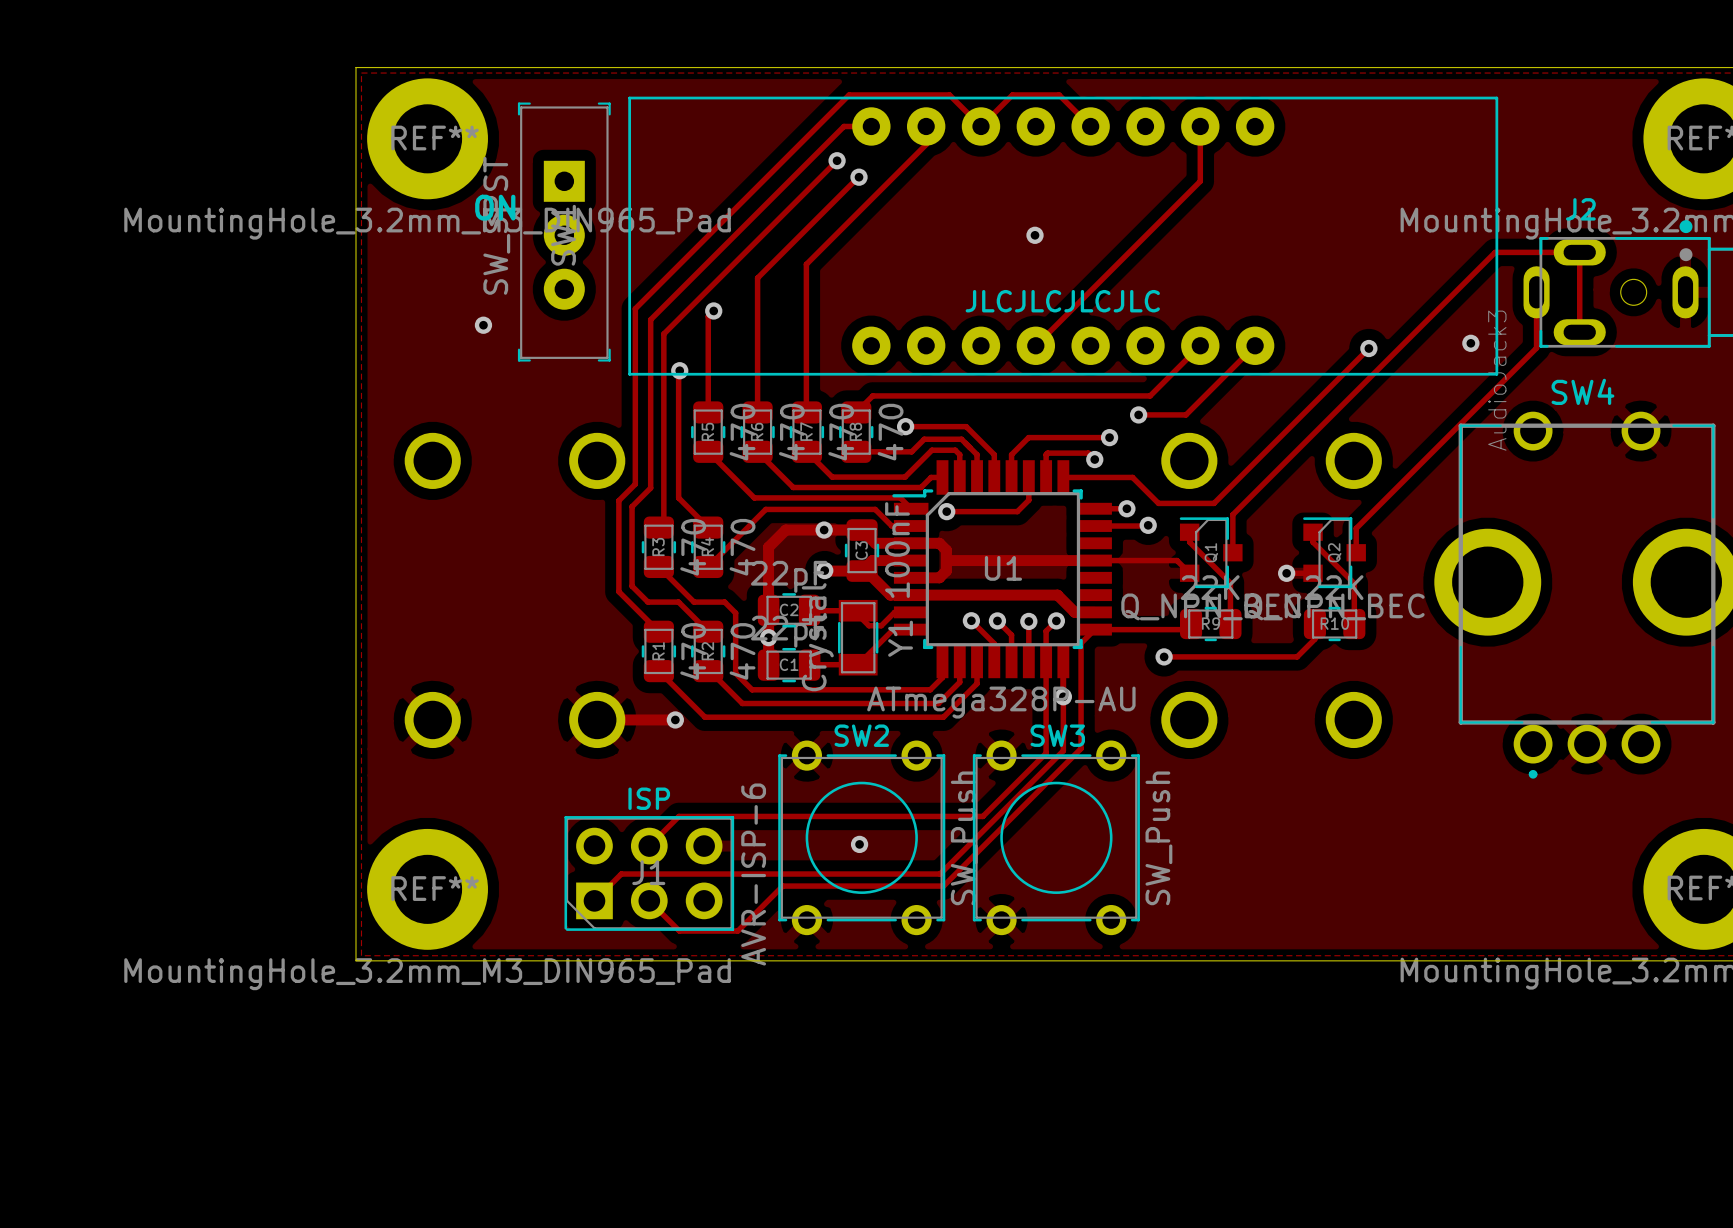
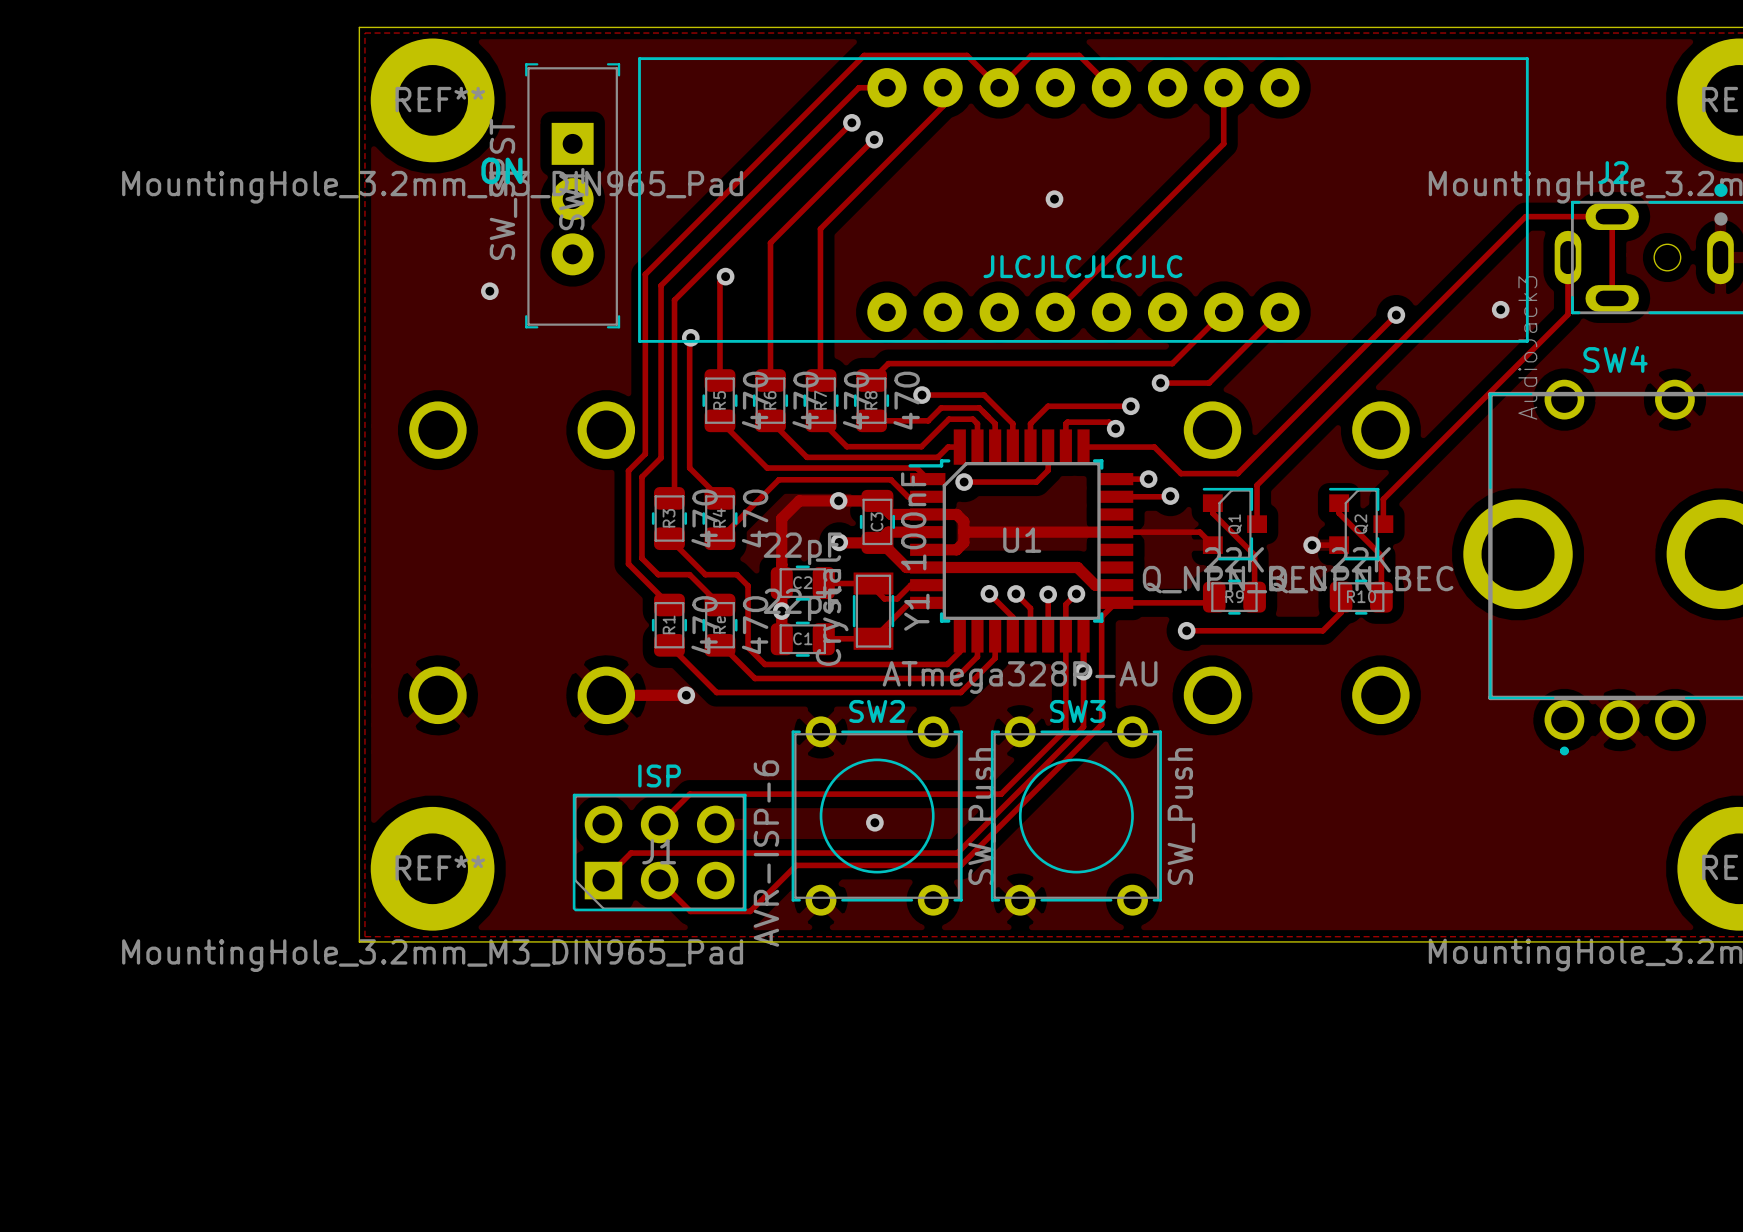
R2 name: R2 (707, 651) -> Re (719, 624)

